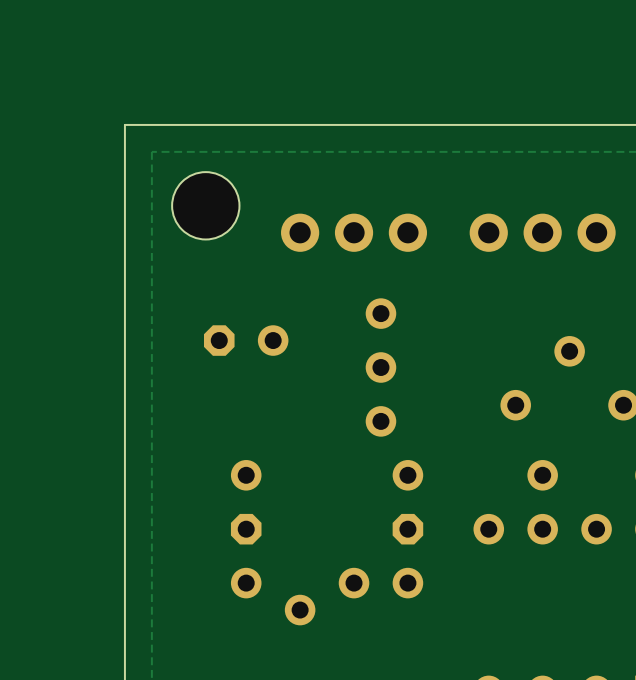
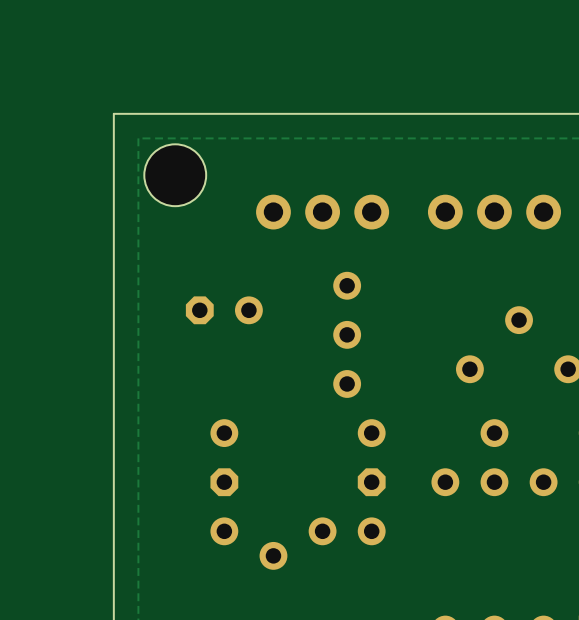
part: none -> (175, 175)
hole: (205, 205) -> none

